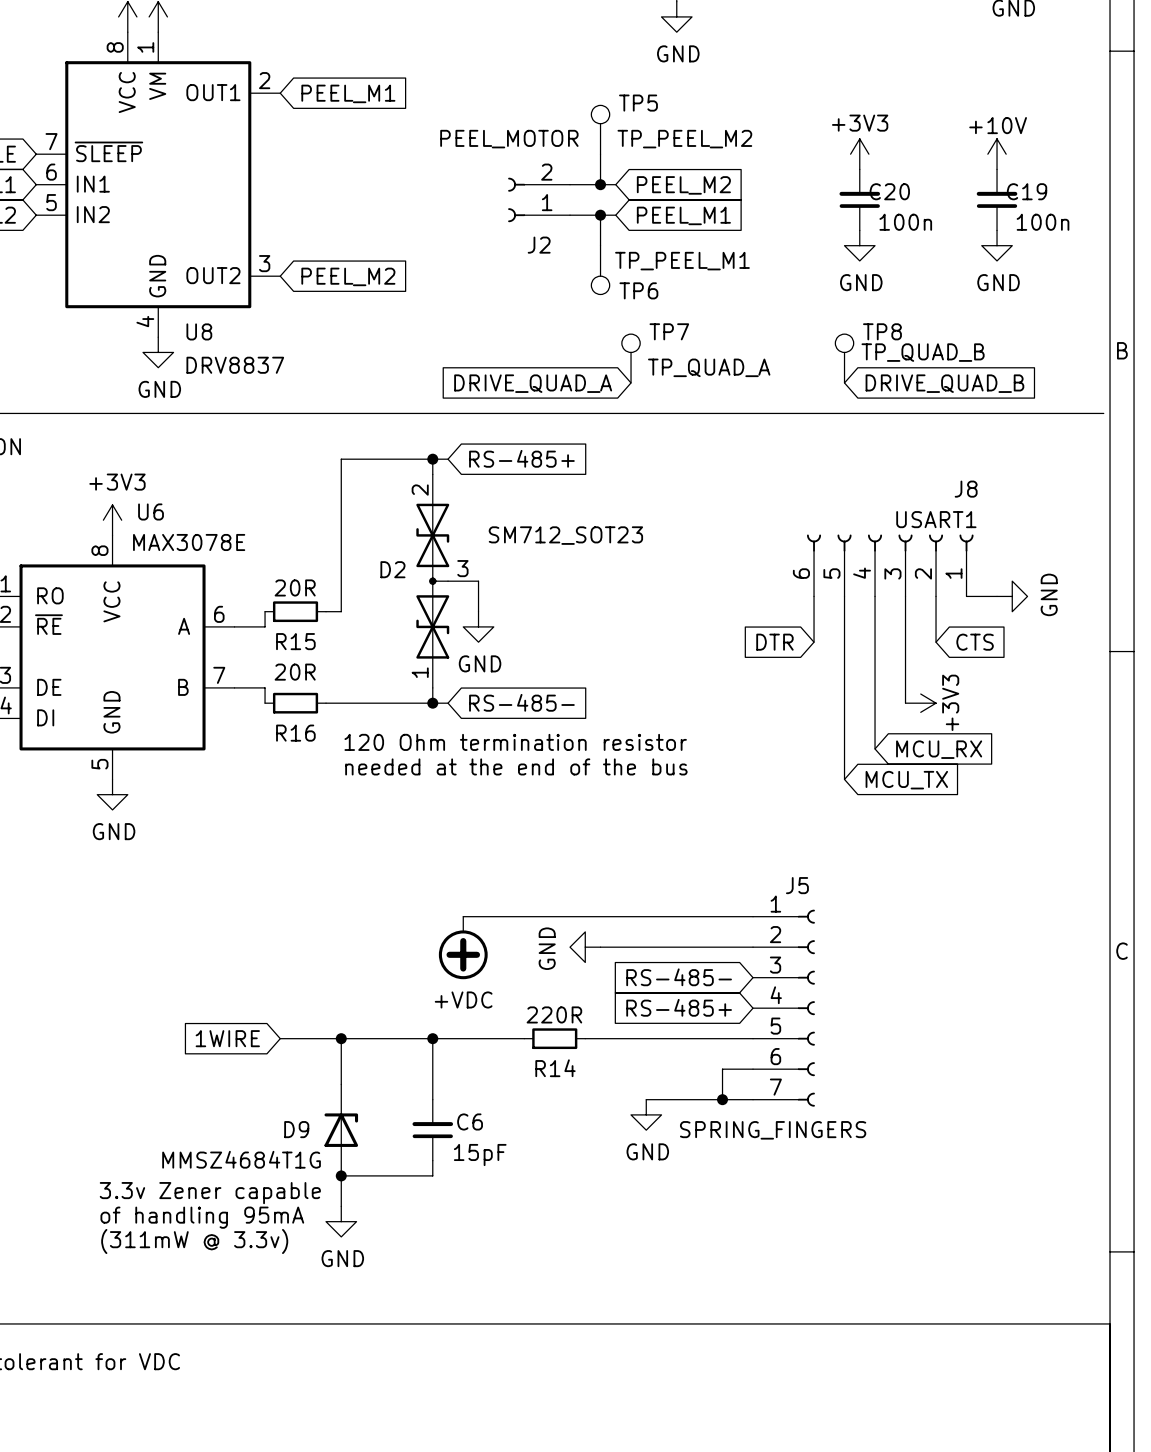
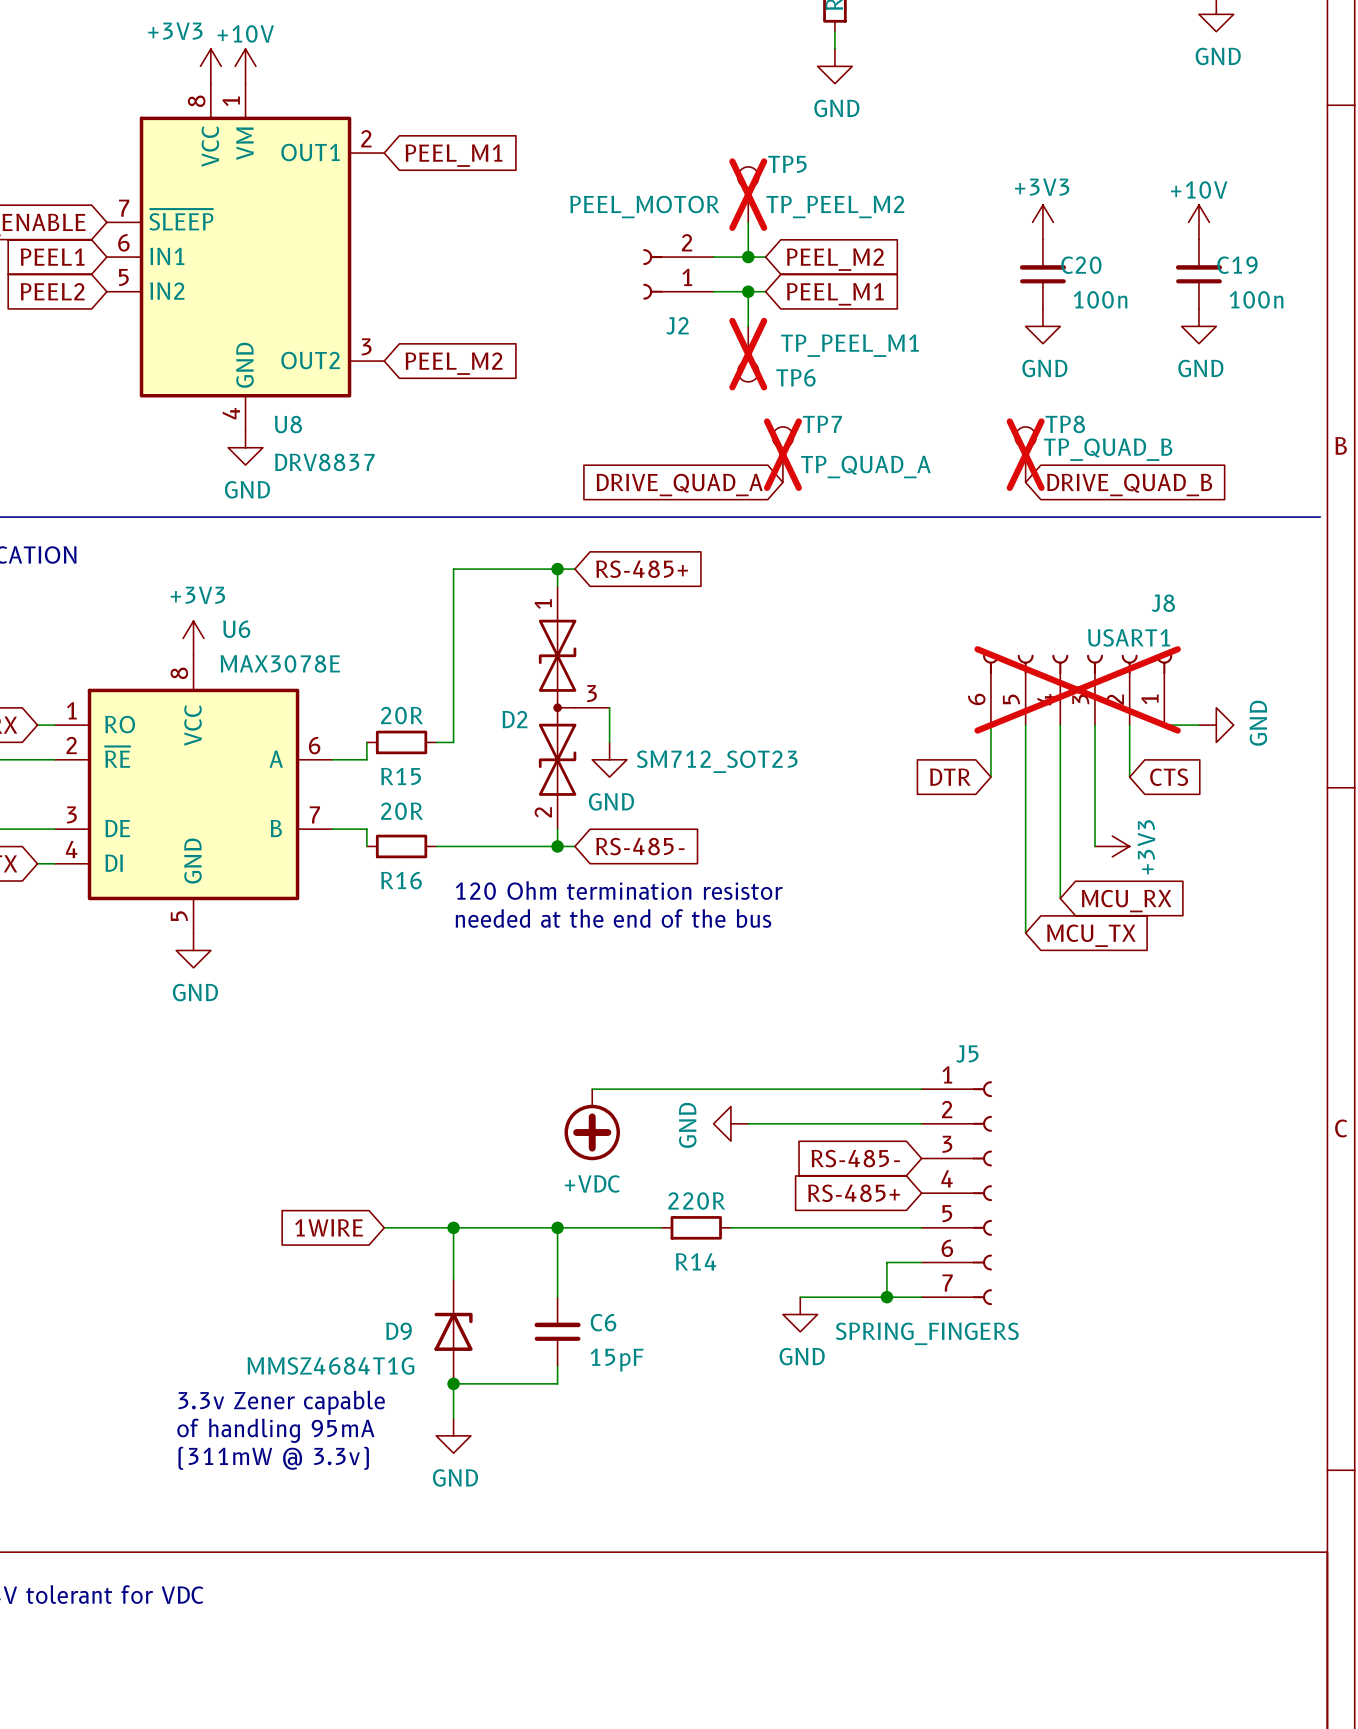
TP5 do-not-place cross: none -> (748, 194)
TP6 do-not-place cross: none -> (748, 354)
TP7 do-not-place cross: none -> (782, 454)
TP8 do-not-place cross: none -> (1025, 454)
J8 do-not-place cross: none -> (1077, 689)
D2 flip: as is (432, 581) -> up-down (557, 707)

